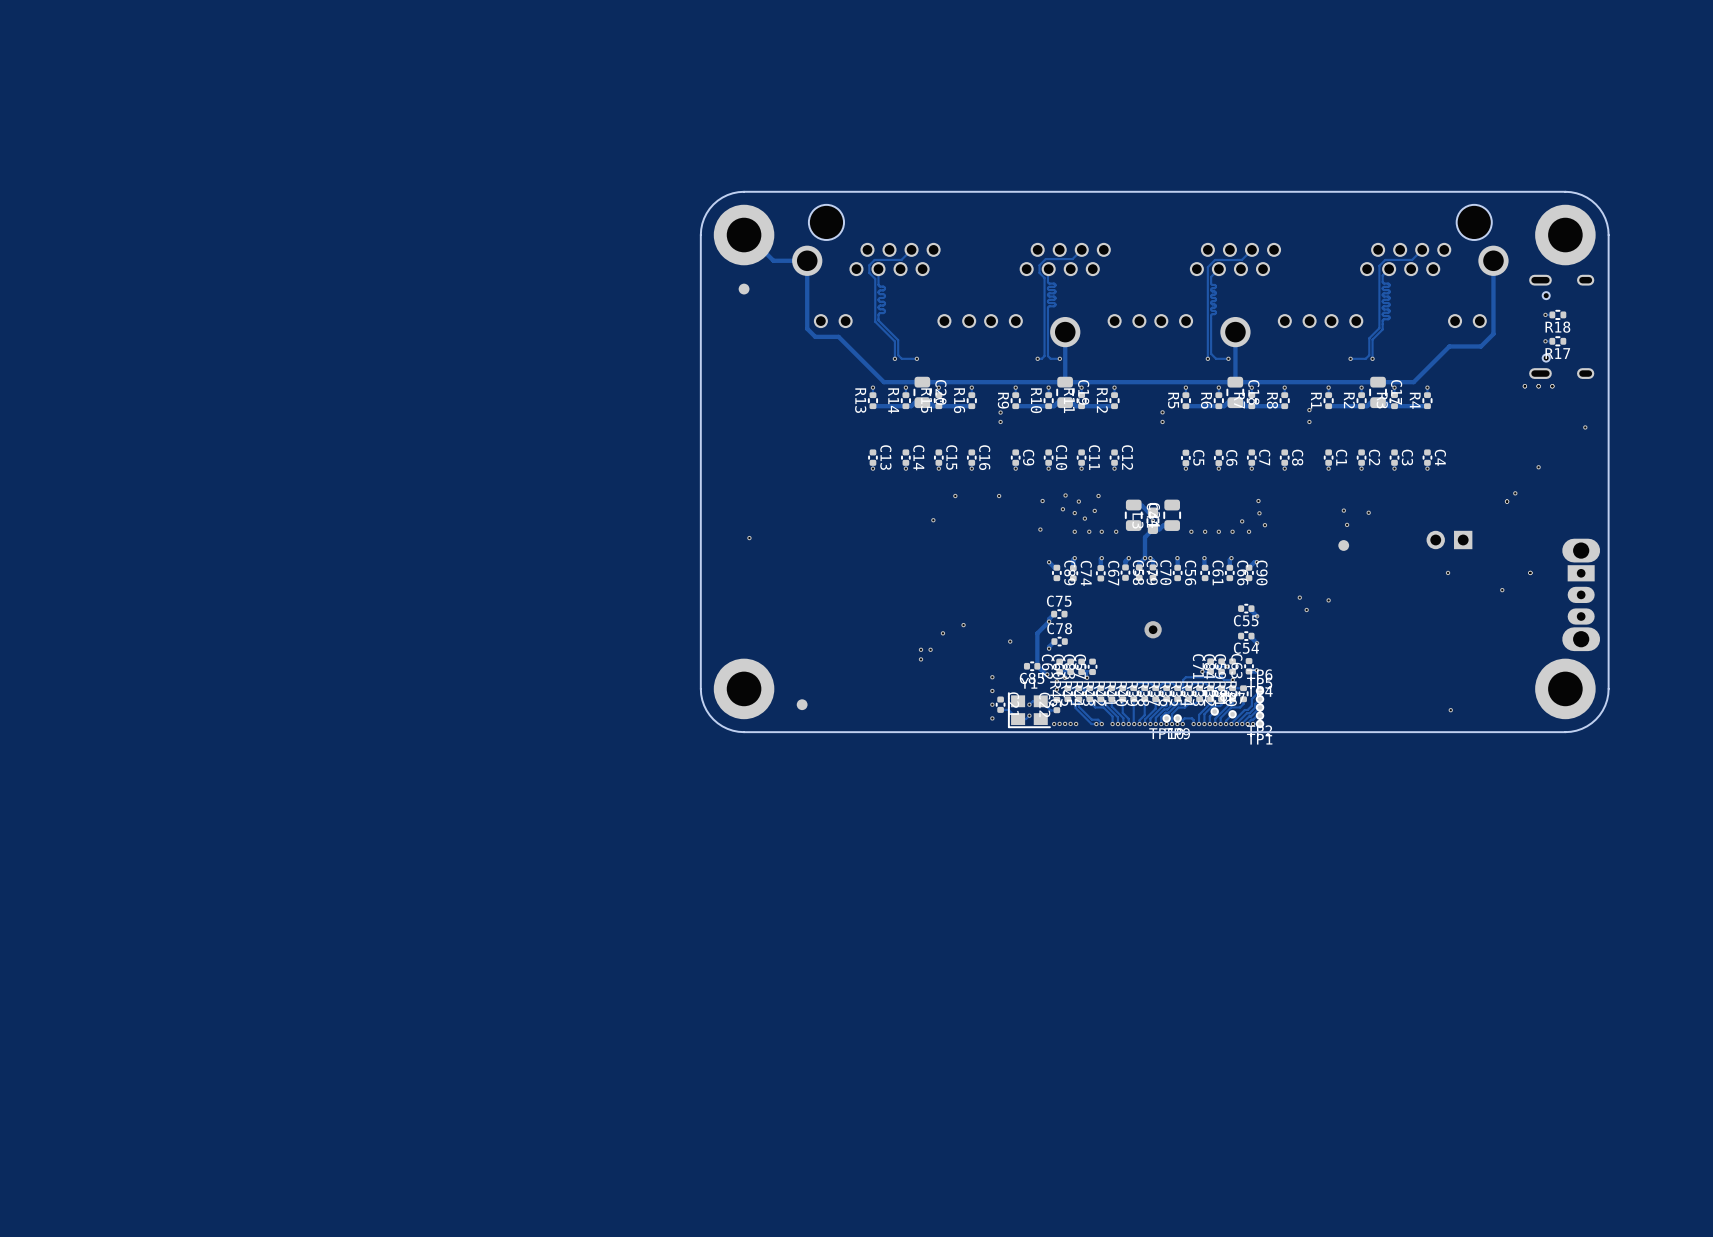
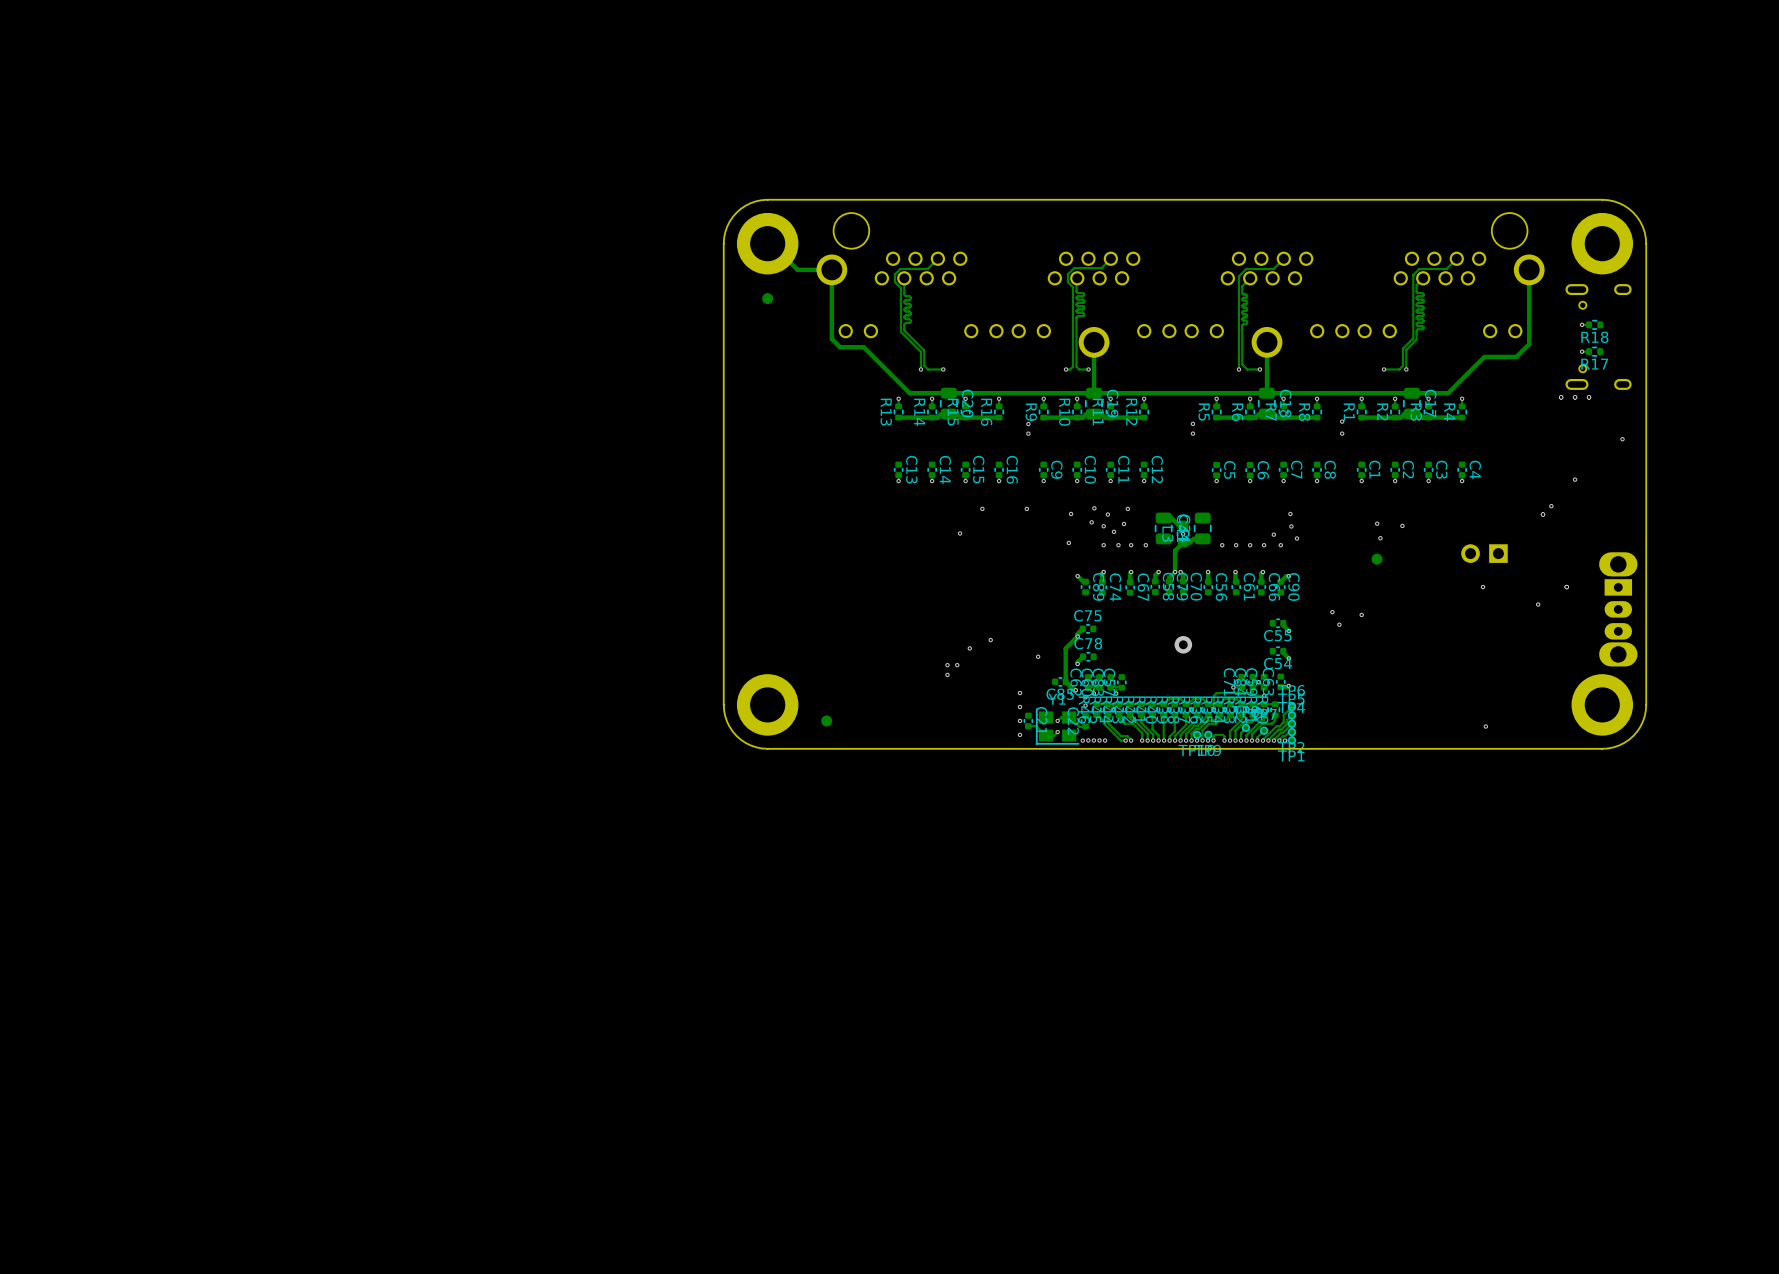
via: (749, 538) -> none

